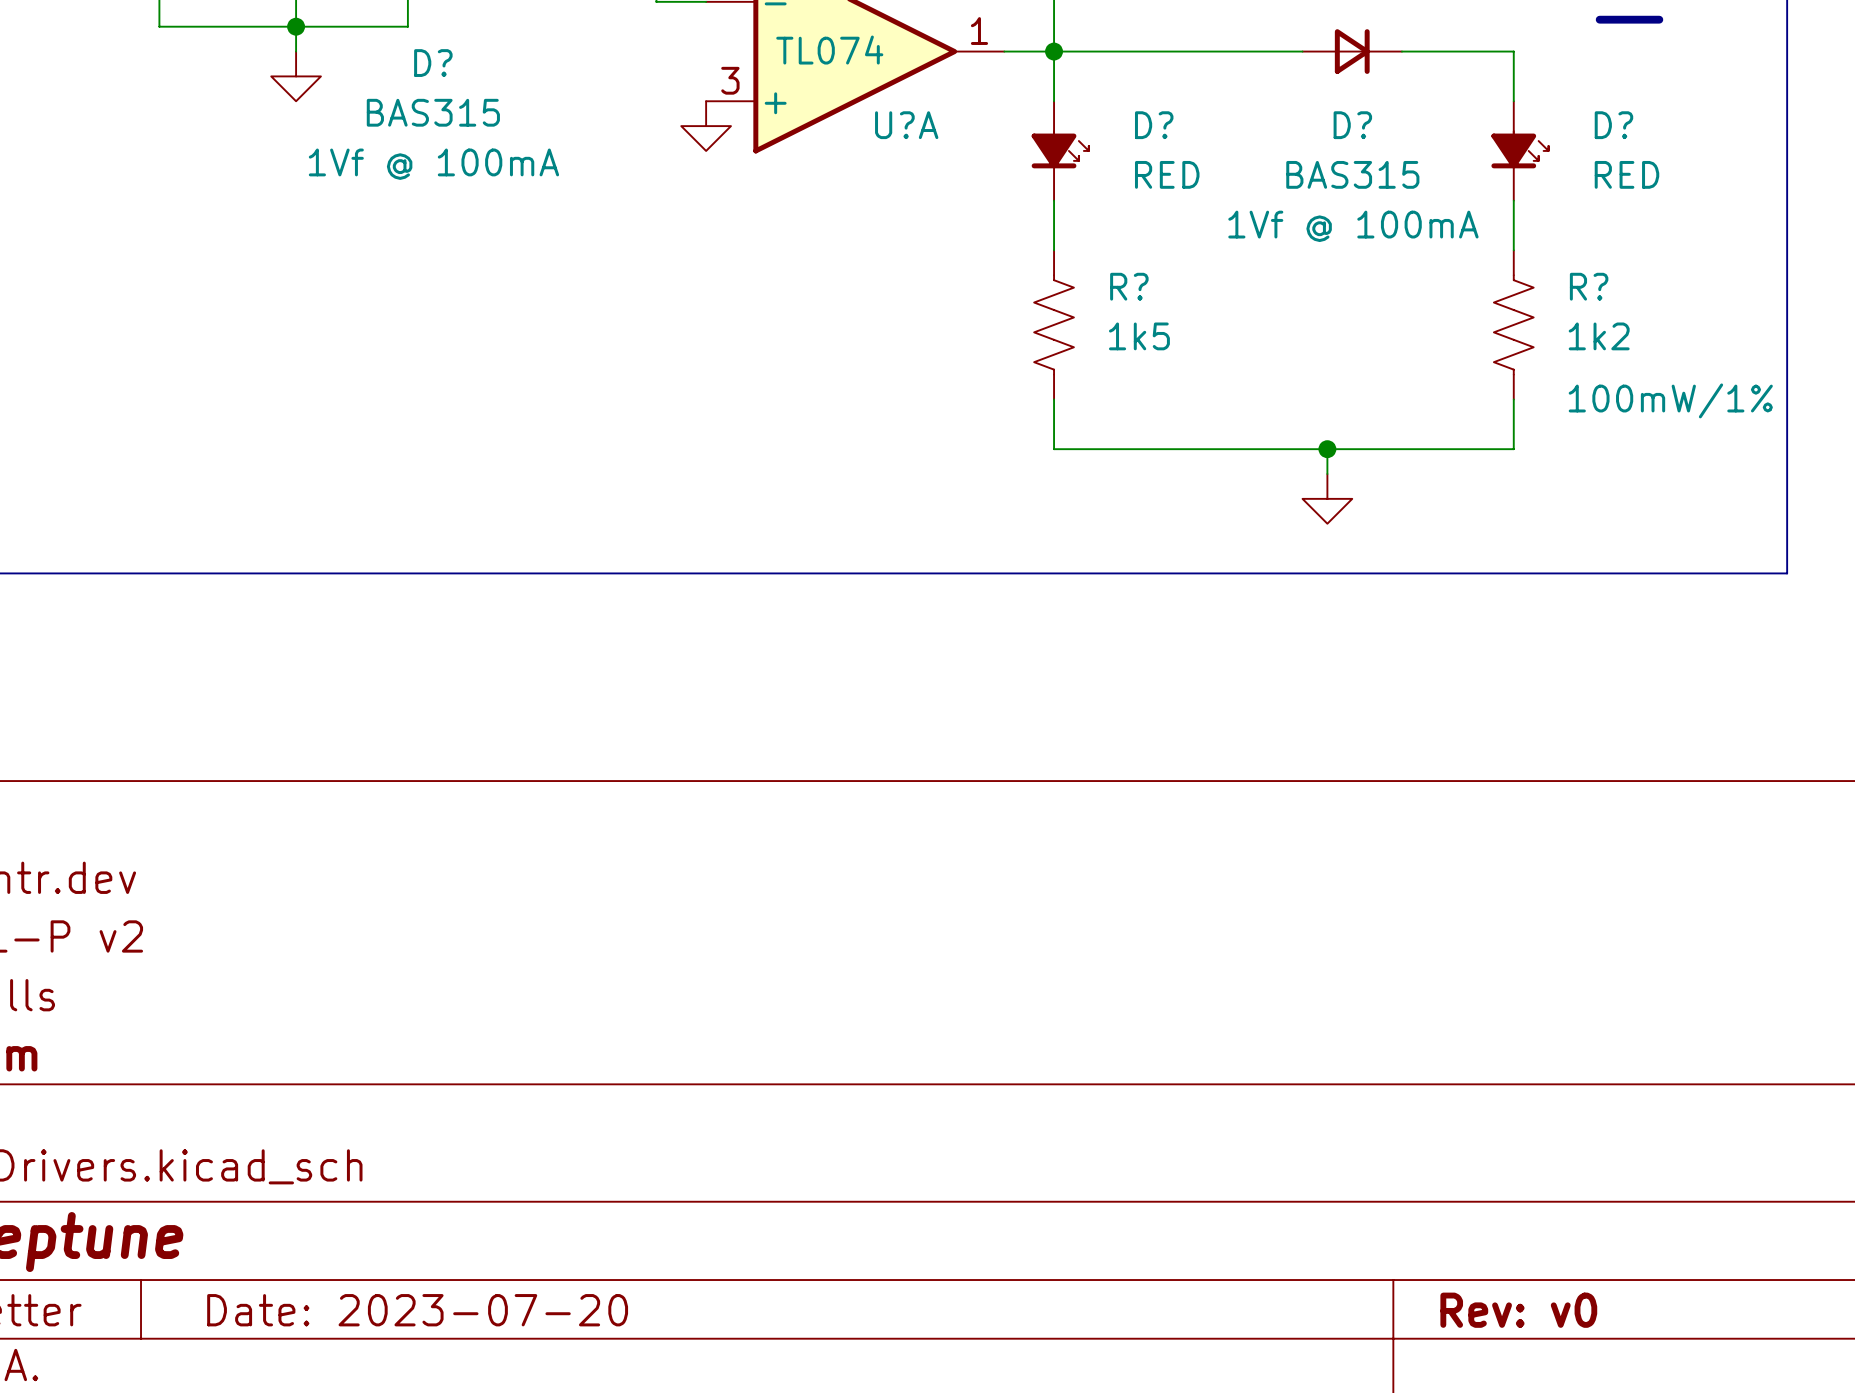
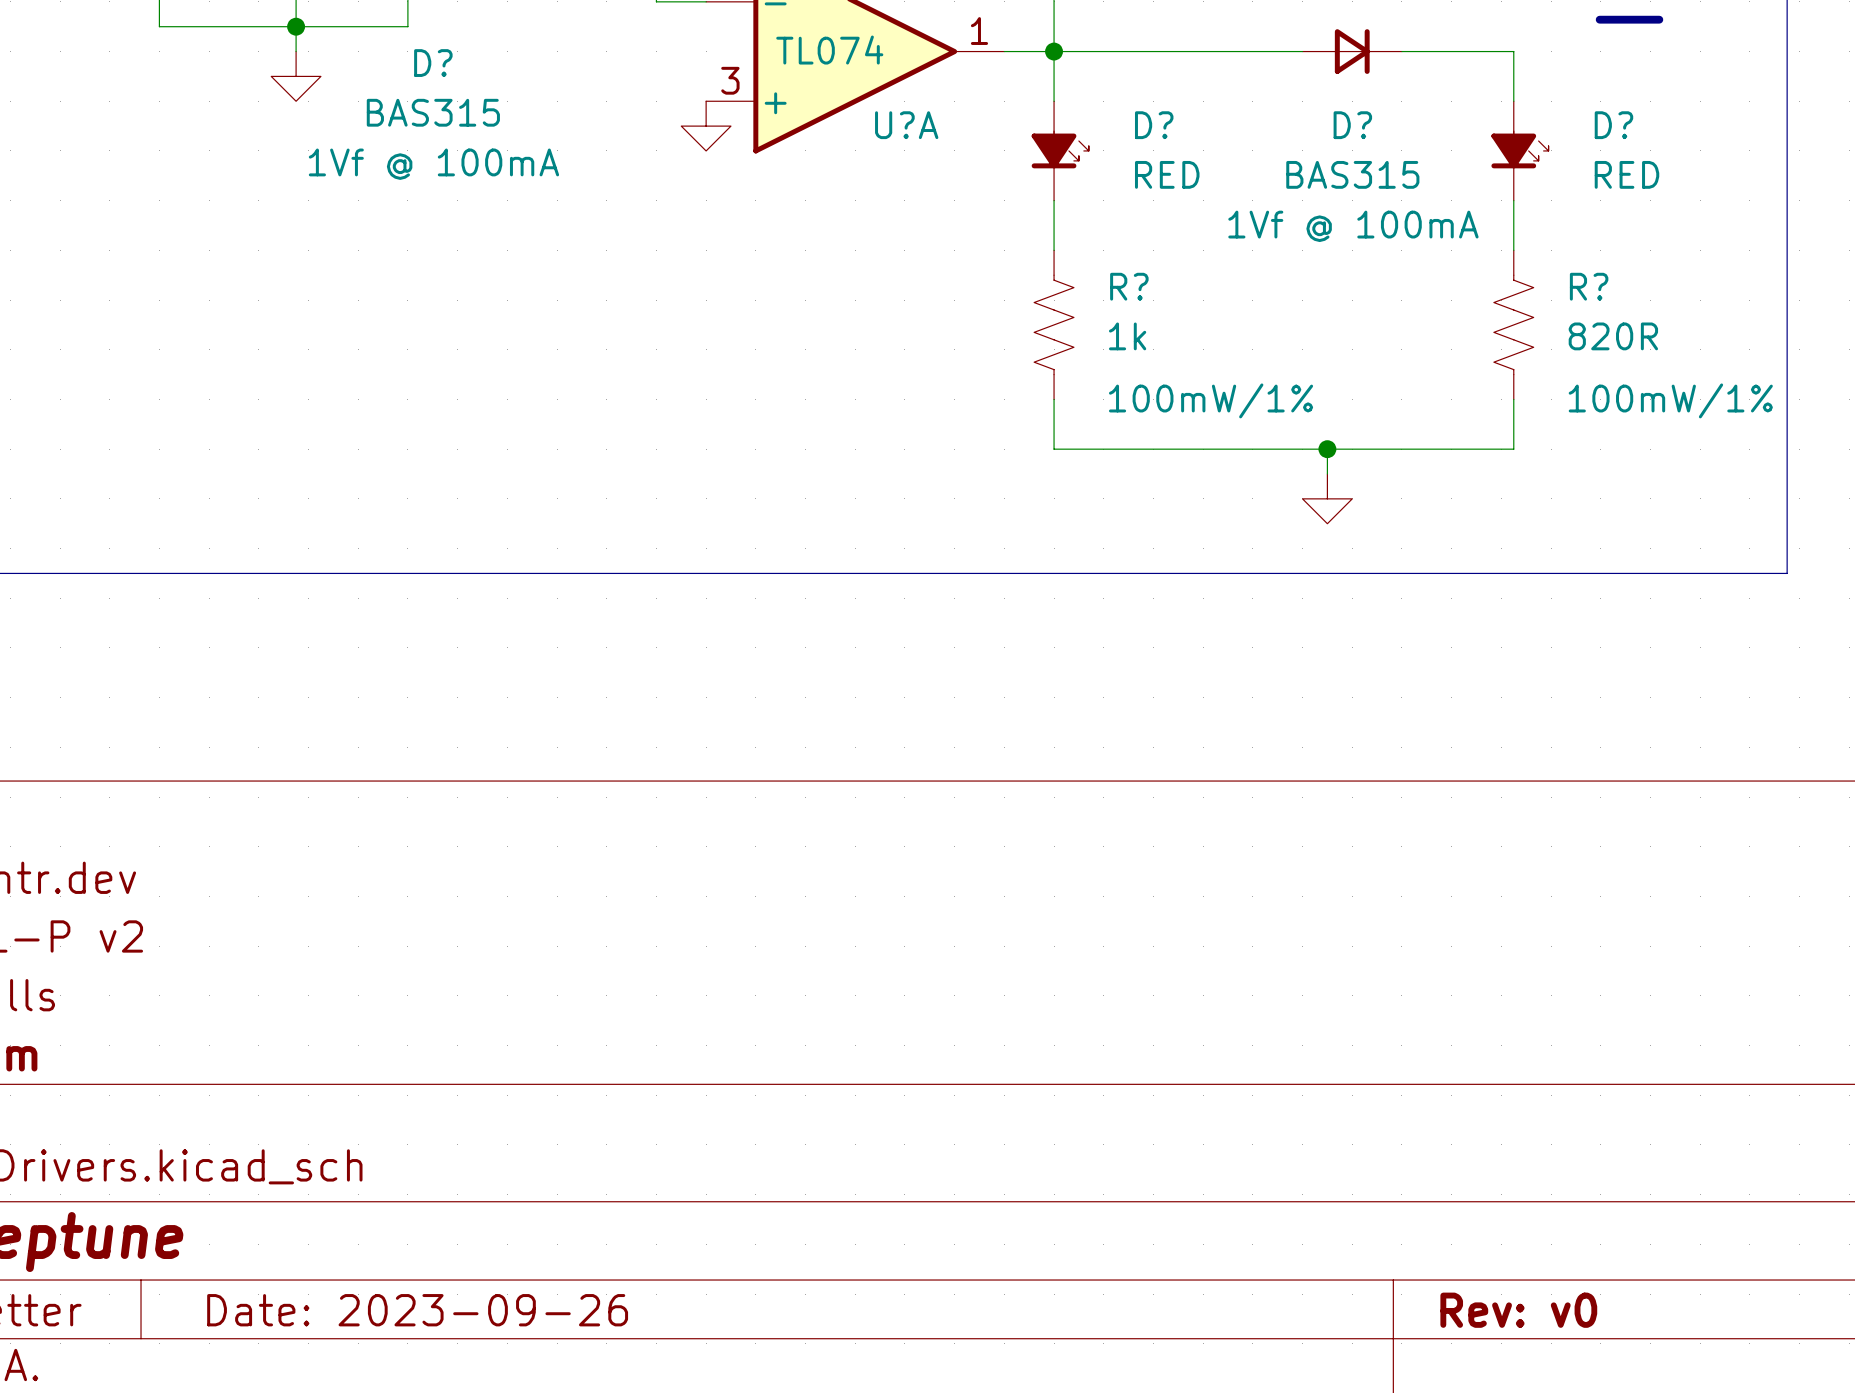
R? value: 1k5 (1139, 336) -> 1k (1127, 336)
R? value: 1k2 (1599, 336) -> 820R (1613, 336)
R? text: none -> 100mW/1% (1211, 400)
title block: Date: 2023-07-20 (417, 1310) -> Date: 2023-09-26 (417, 1310)

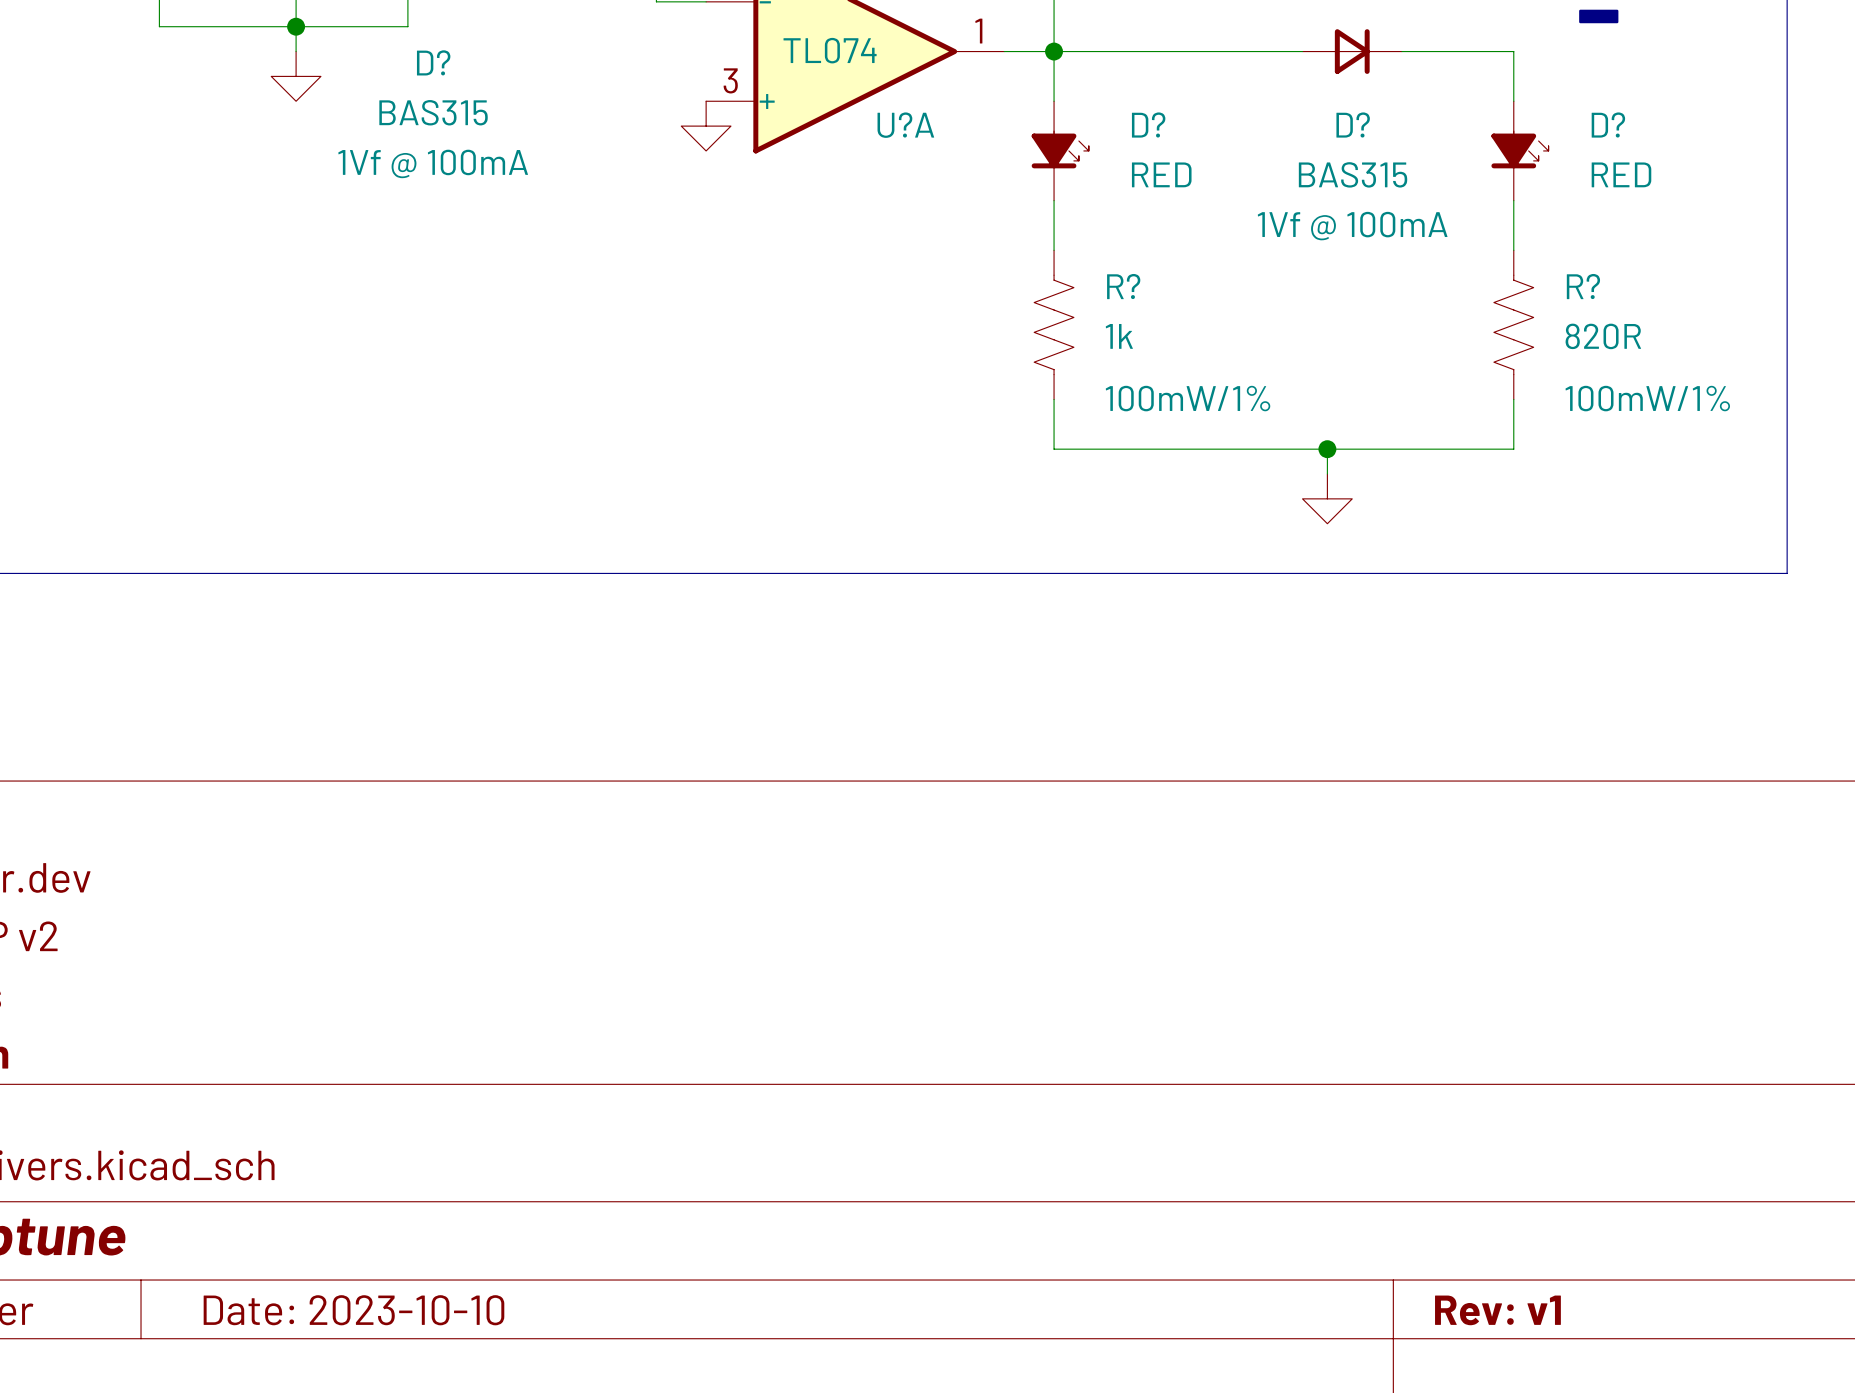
title block: Date: 2023-09-26 (417, 1310) -> Date: 2023-10-10 (353, 1310)
title block: Rev: v0 (1518, 1310) -> Rev: v1 (1497, 1310)

